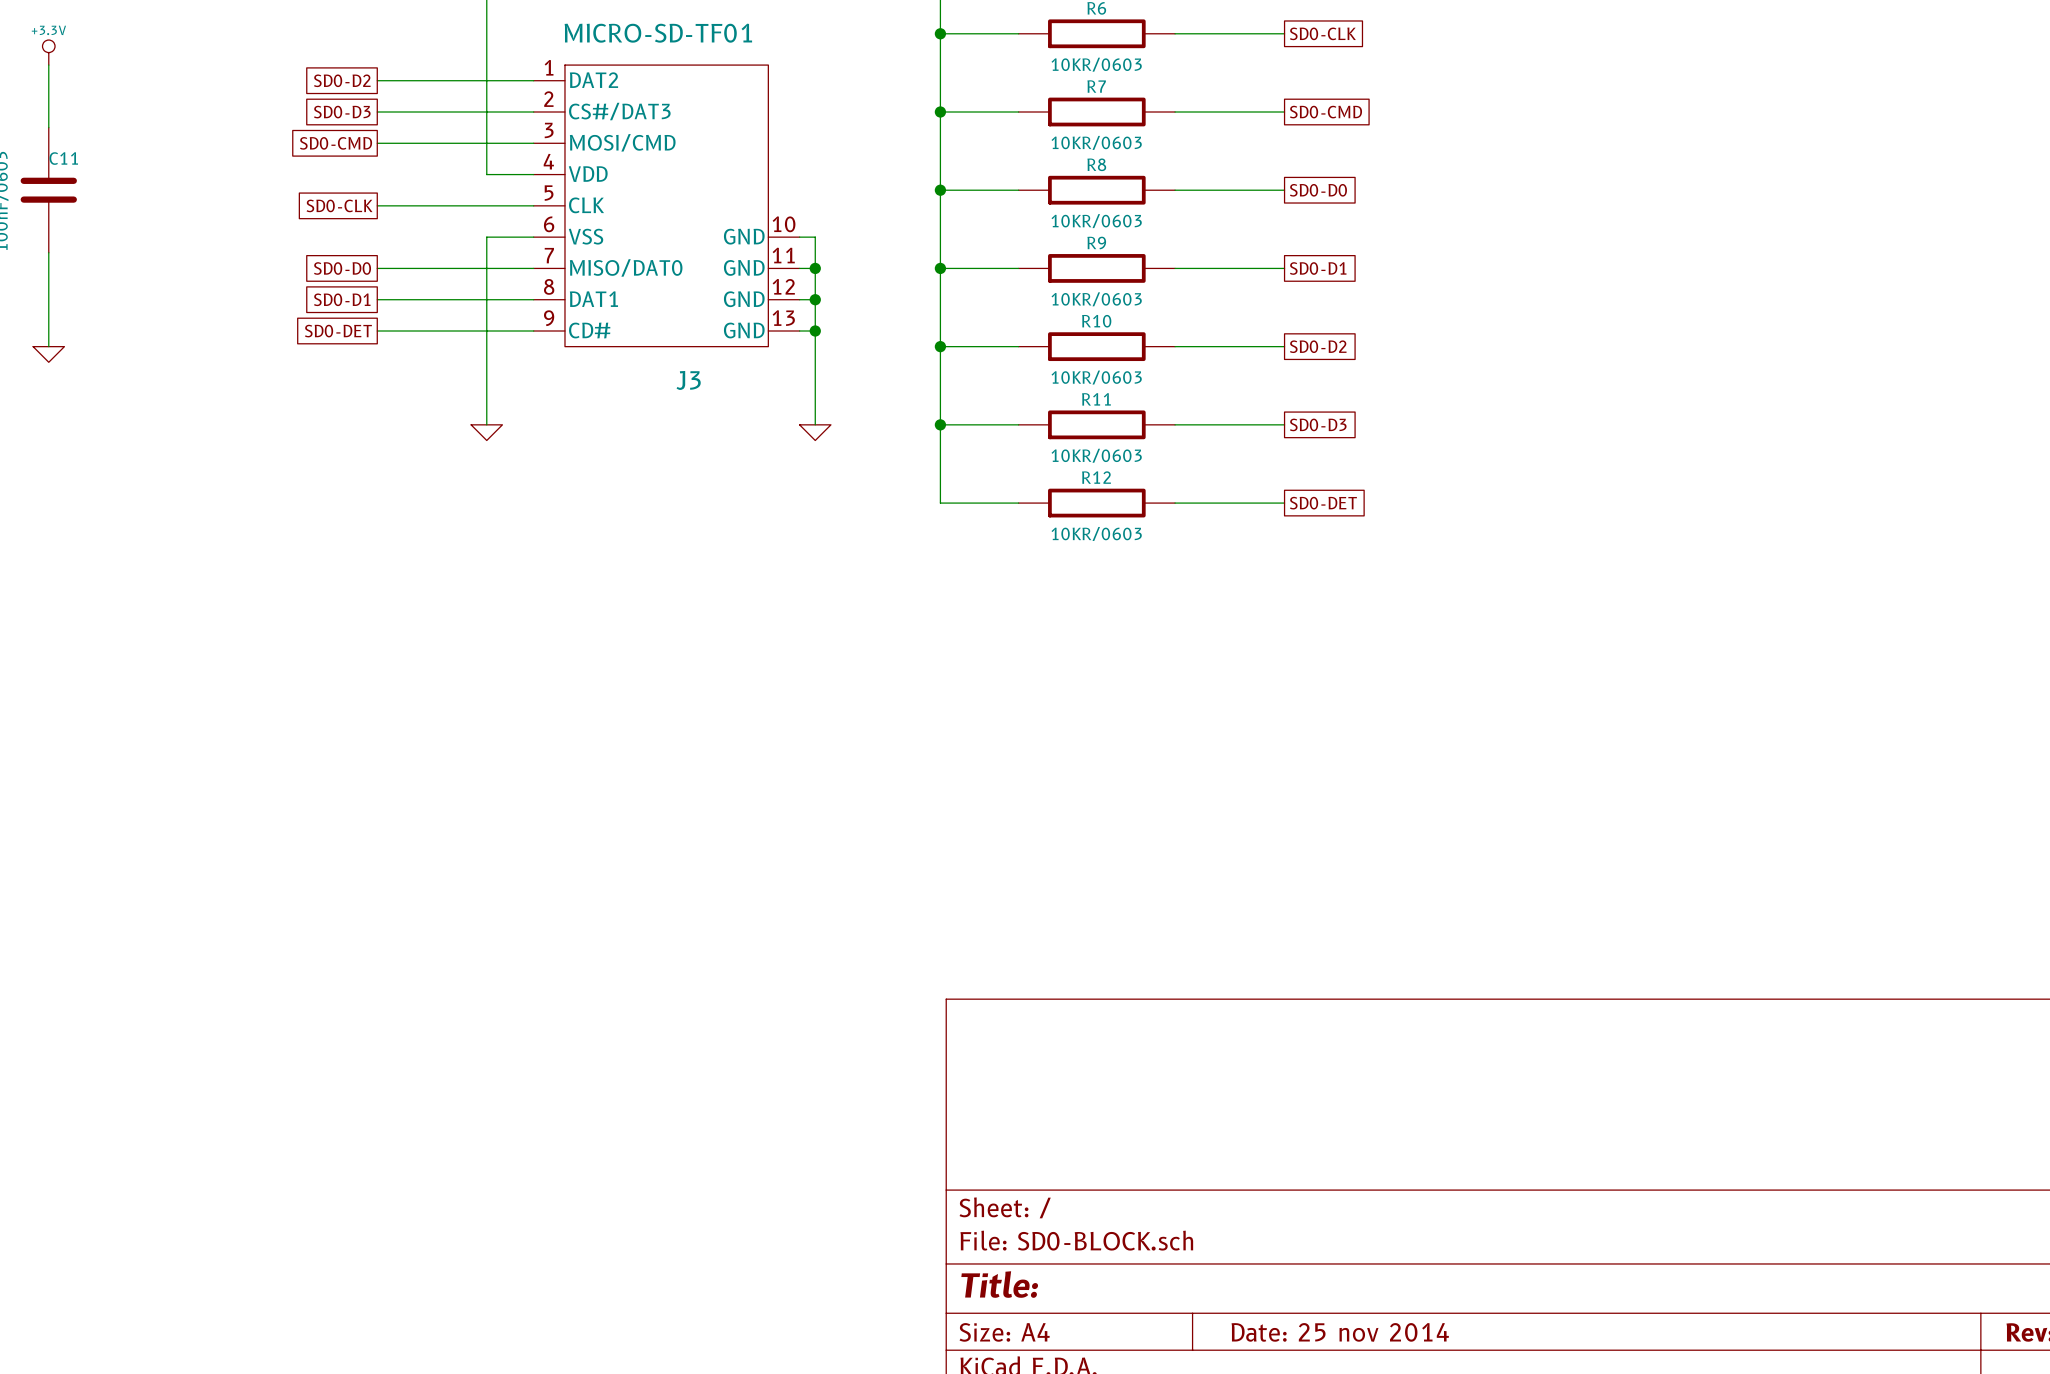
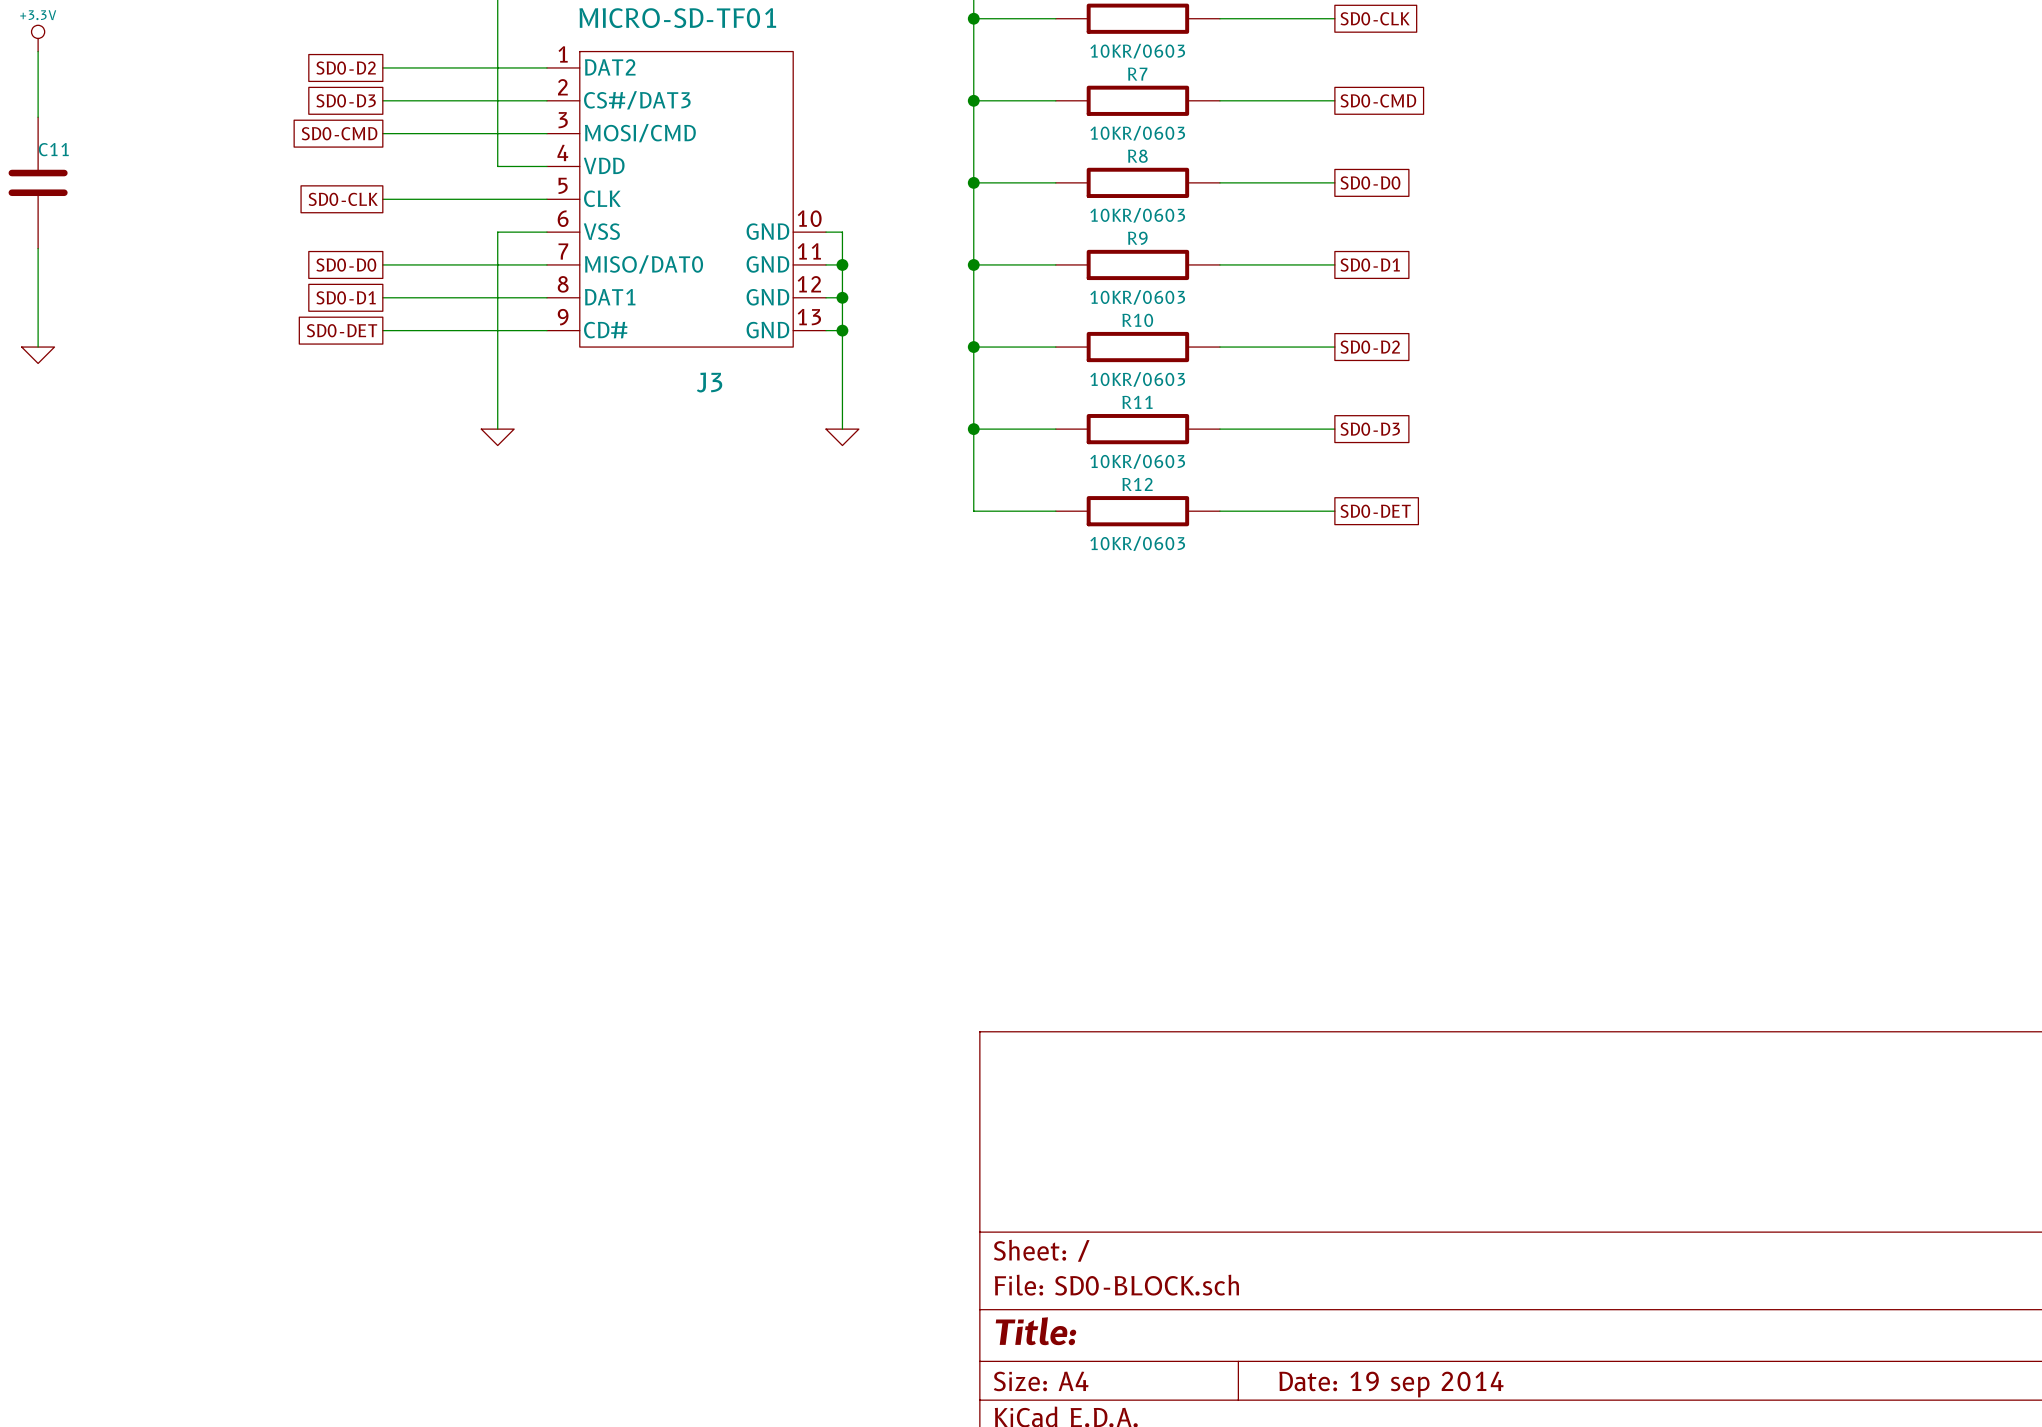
title block: Date: 25 nov 2014 (1340, 1332) -> Date: 19 sep 2014 (1391, 1384)

